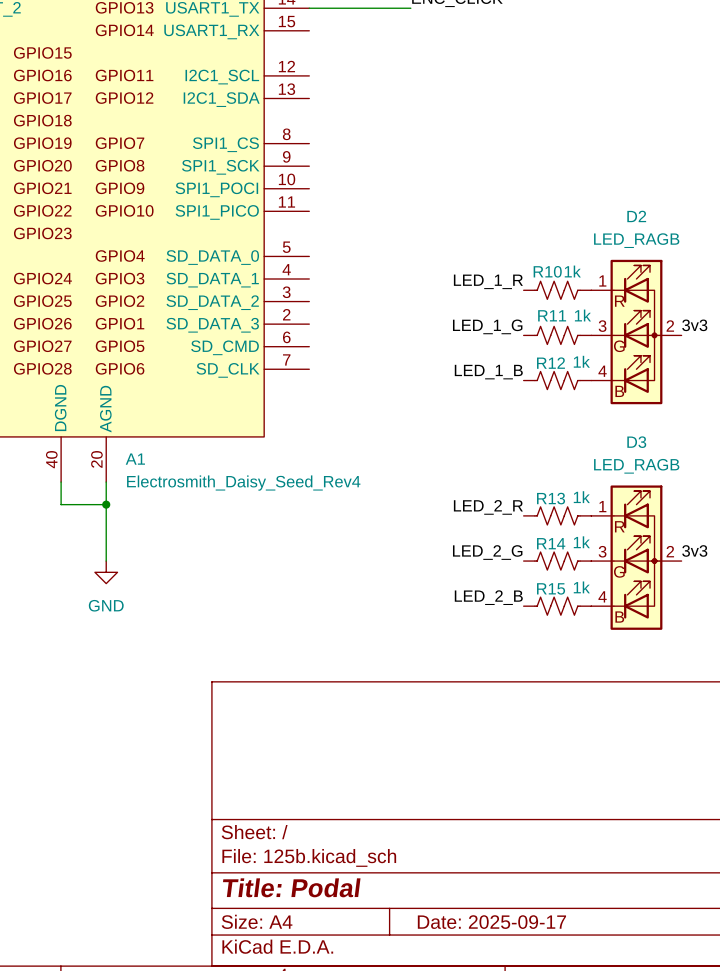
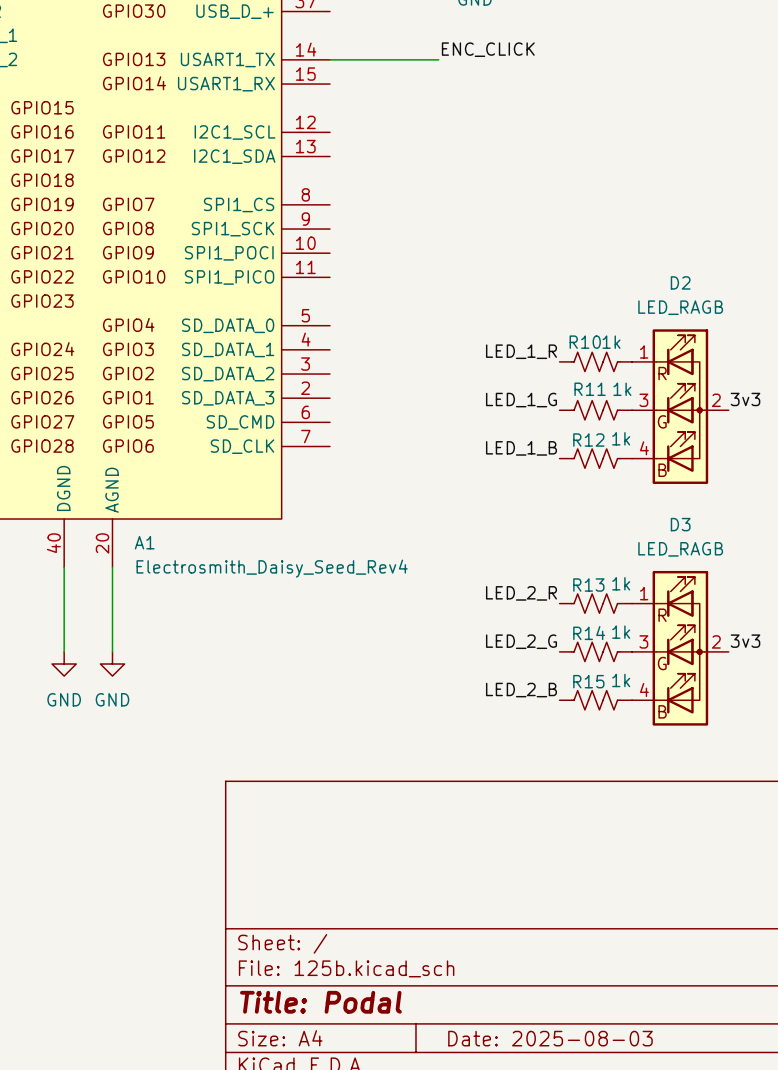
wire: (61, 504) (106, 504) -> (64, 591) (64, 651)
junction: (106, 504) -> none
power symbol: none -> GND (64, 664)
title block: Date: 2025-09-17 (491, 922) -> Date: 2025-08-03 (550, 1038)

